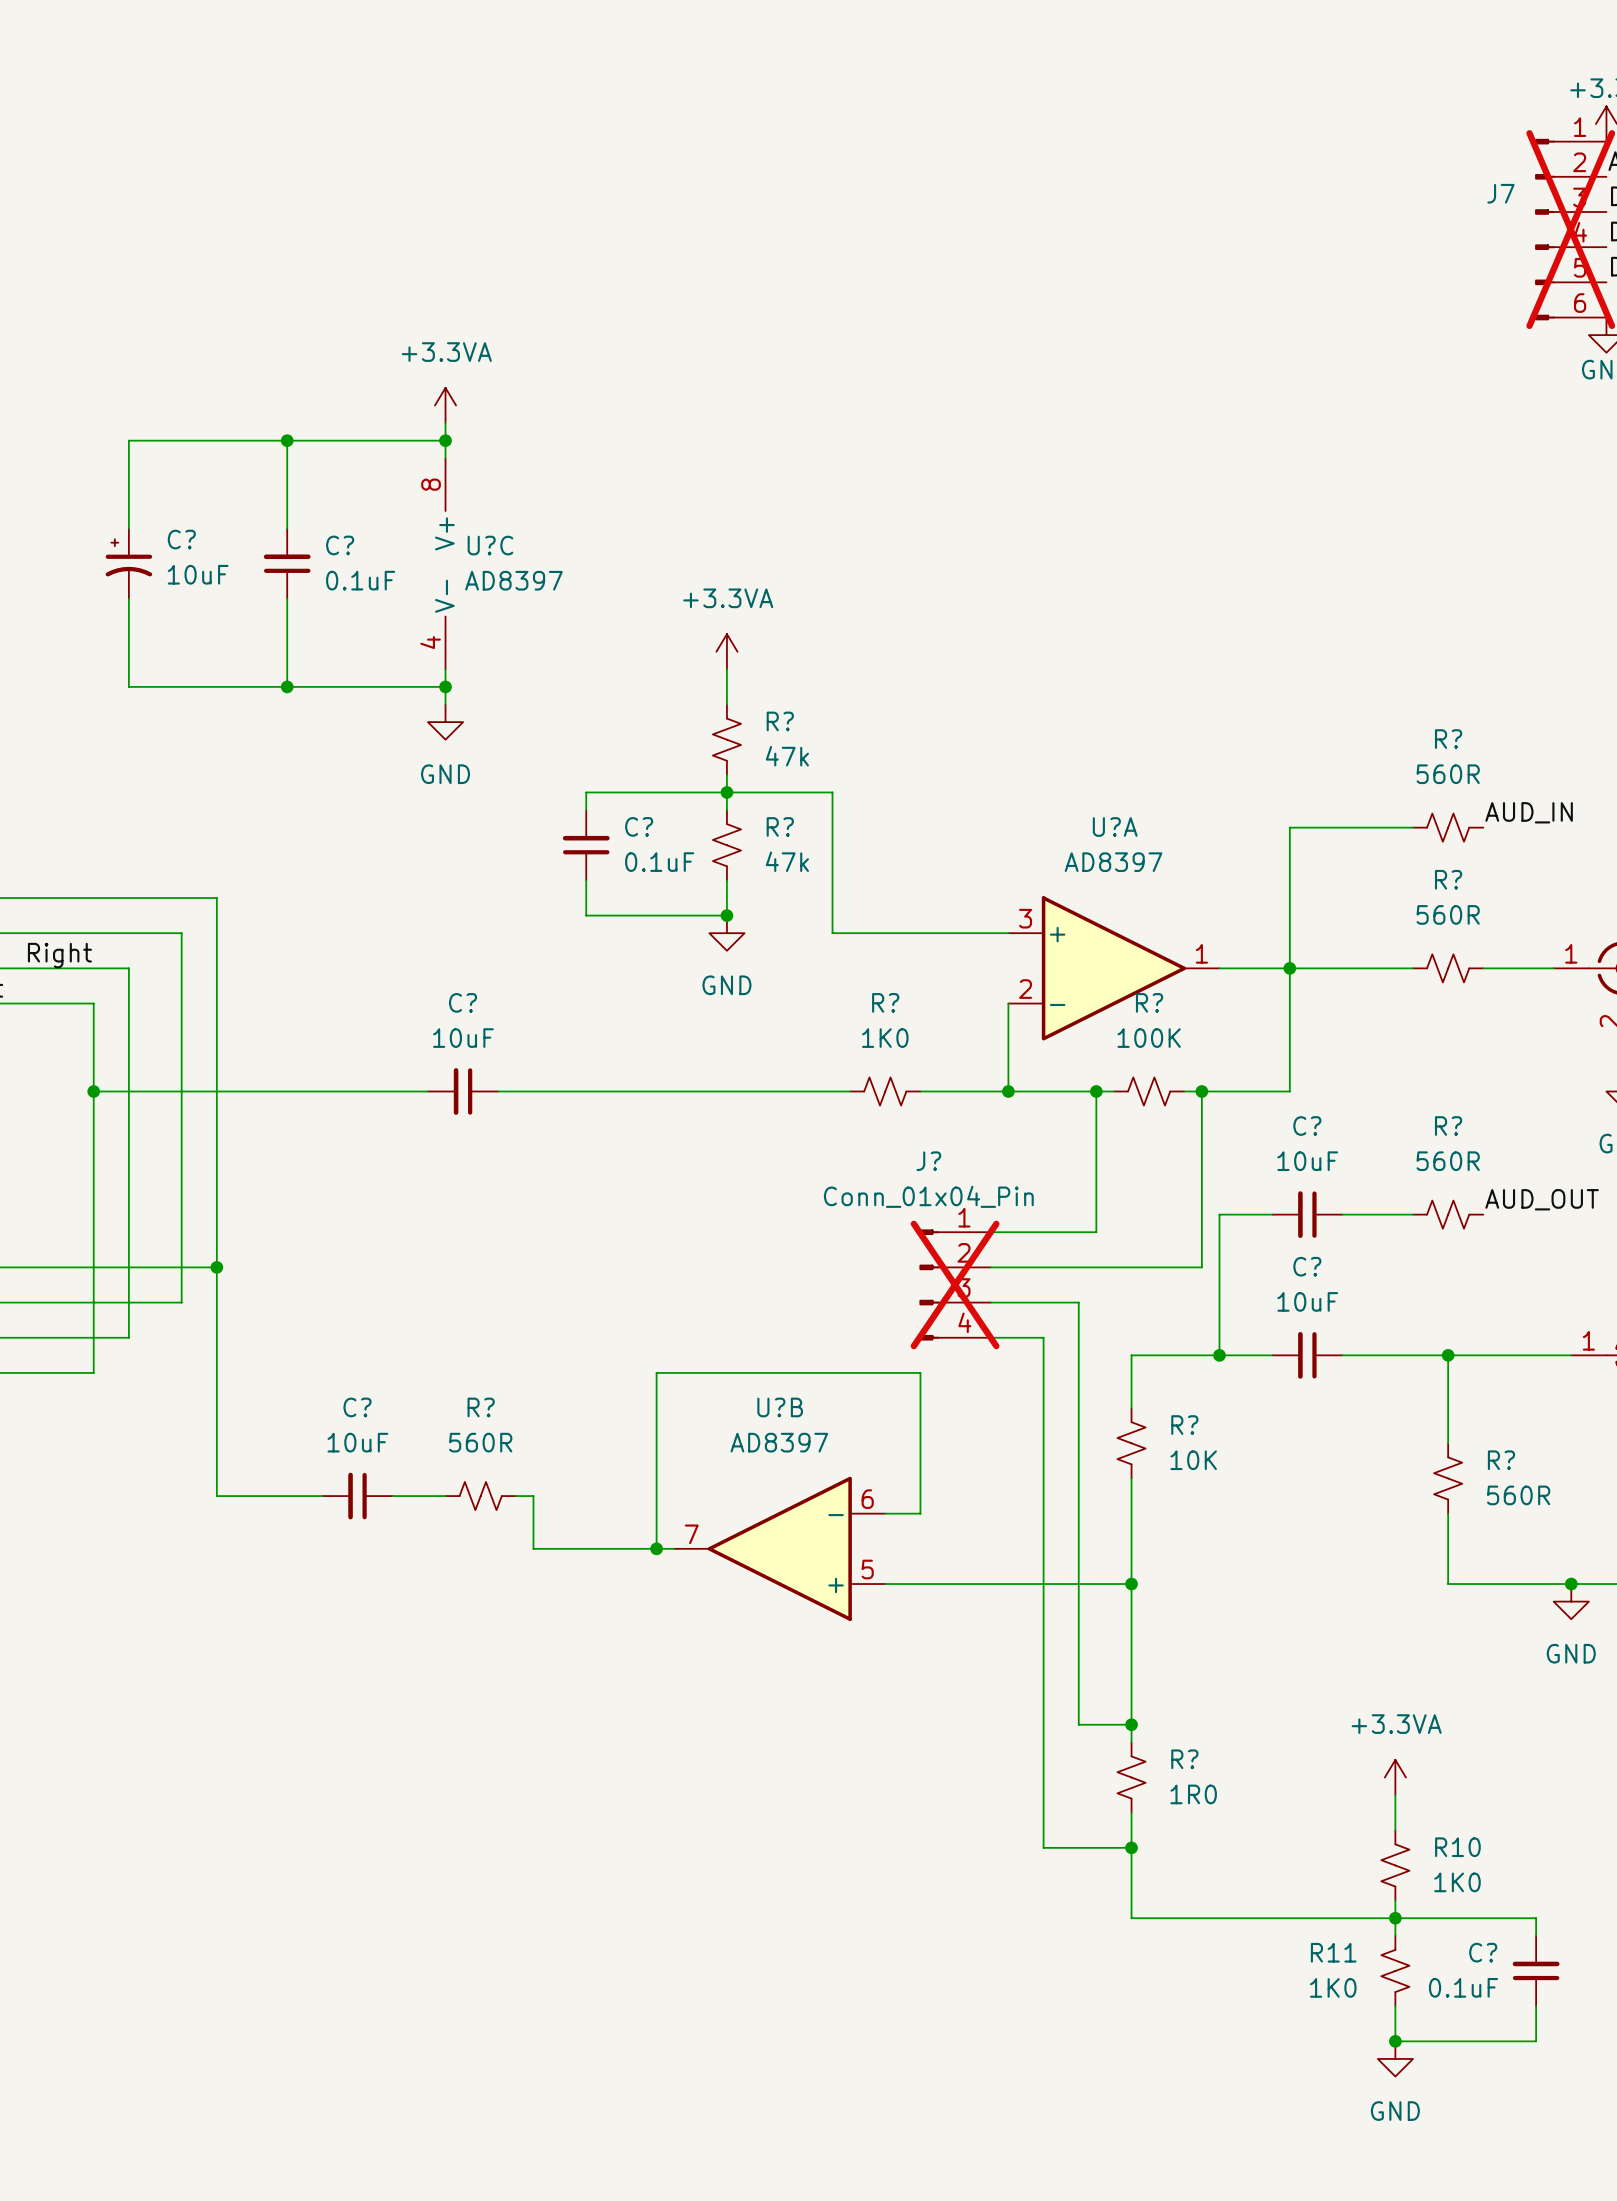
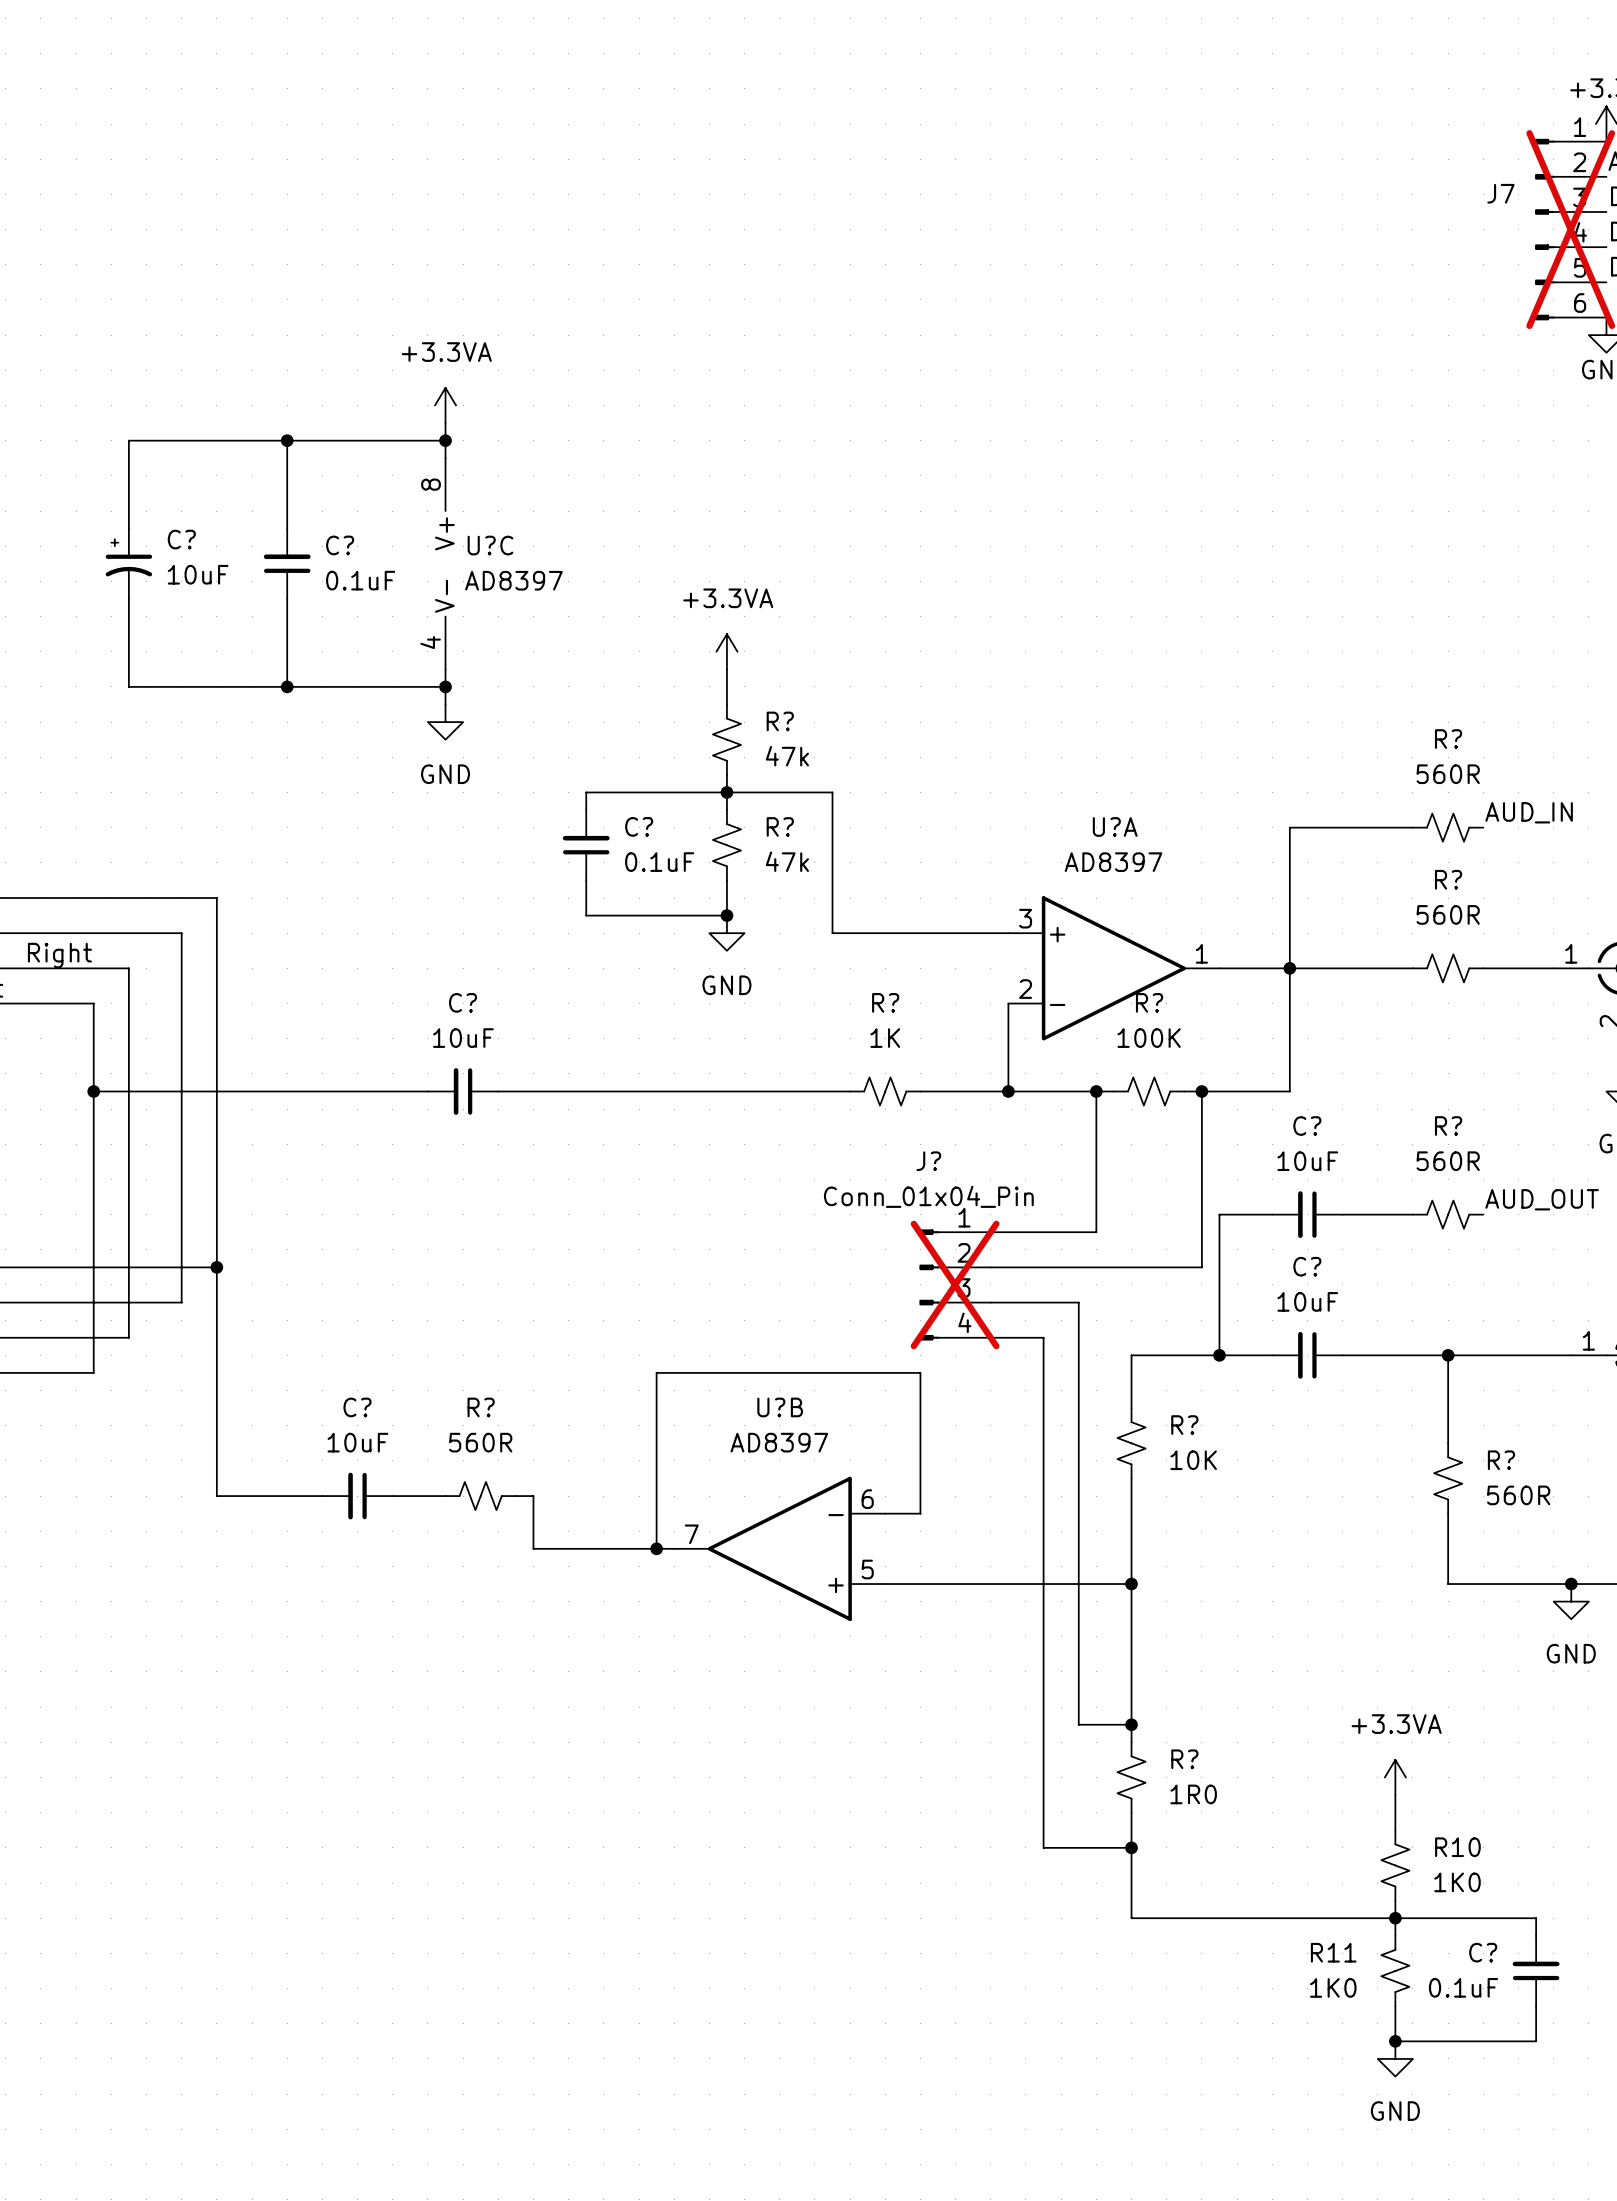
R? value: 1K0 (885, 1038) -> 1K (885, 1038)

